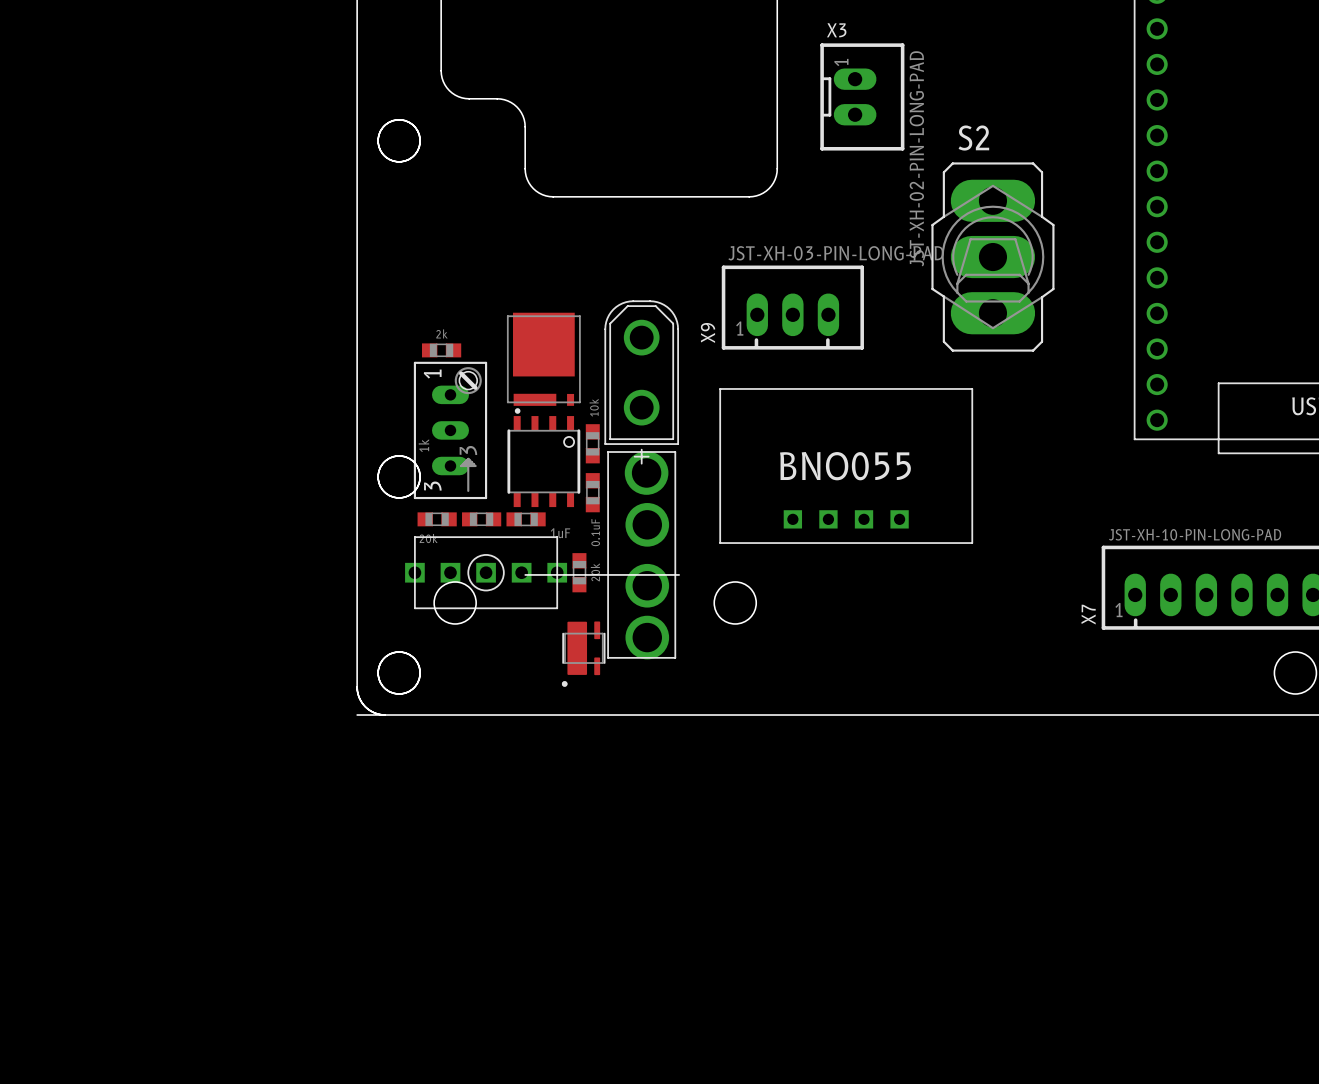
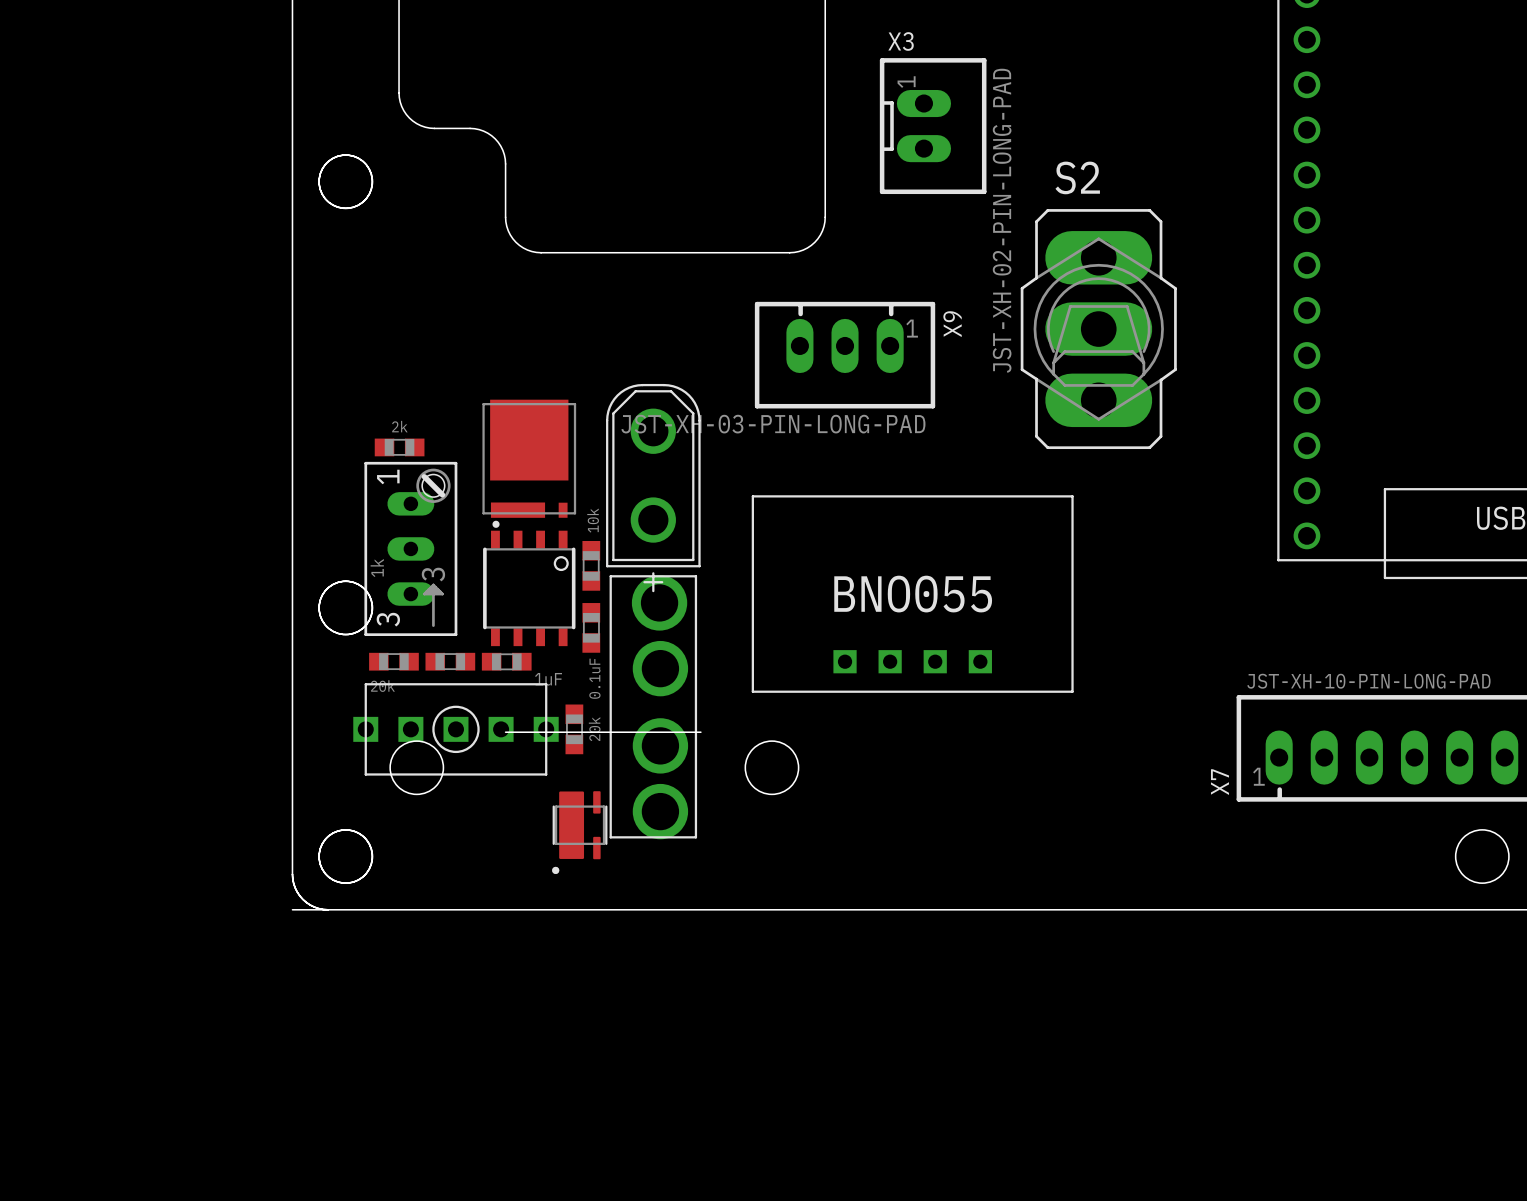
X9 value position: JST-XH-03-PIN-LONG-PAD (836, 253) -> JST-XH-03-PIN-LONG-PAD (773, 424)
X9 footprint: [721, 265, 864, 350] -> [754, 301, 936, 409]
X9 name position: X9 (708, 332) -> X9 (952, 324)

